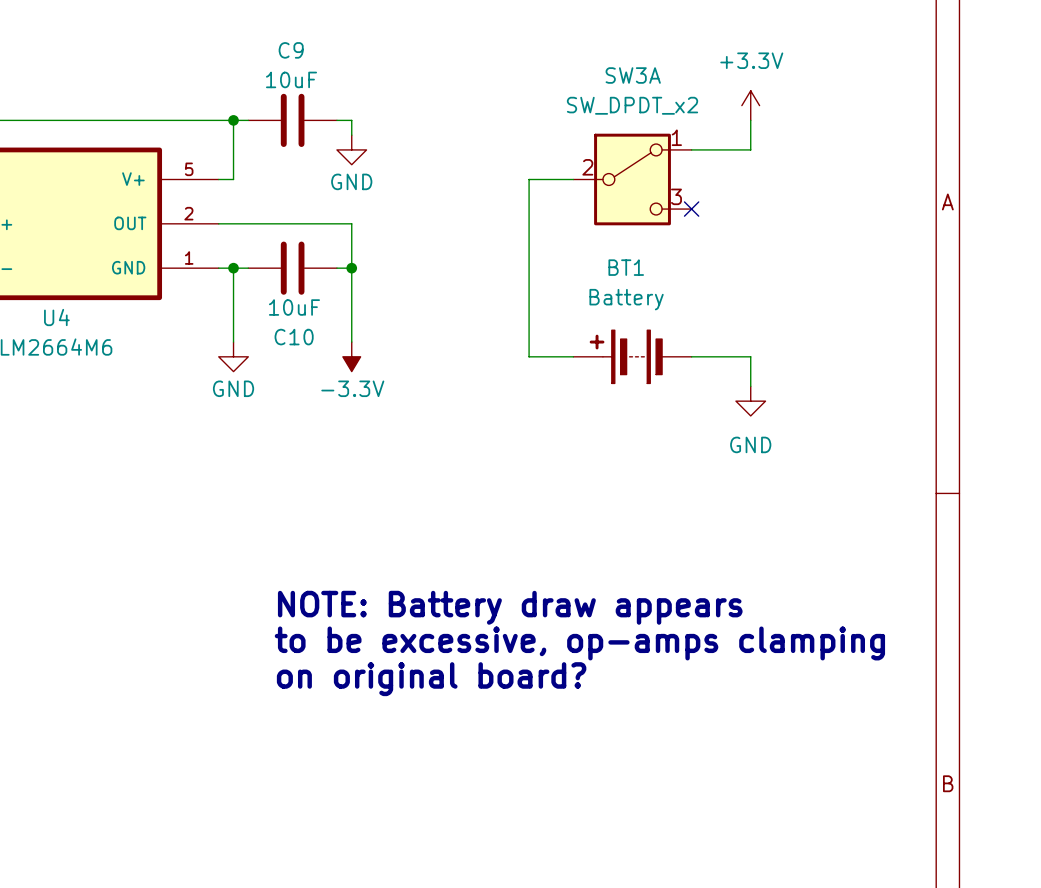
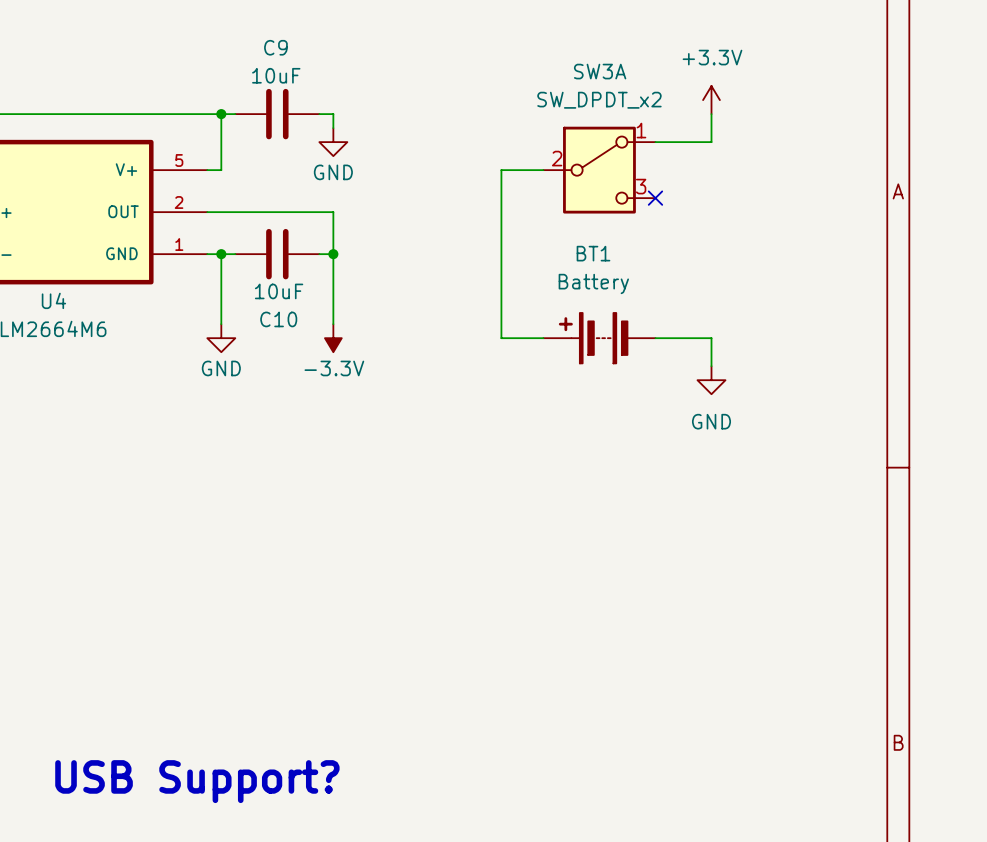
text: NOTE: Battery draw appears (510, 607) -> none
text: to be excessive, op-amps clamping (579, 643) -> none
text: on original board? (431, 679) -> none
text: none -> USB Support? (197, 781)

